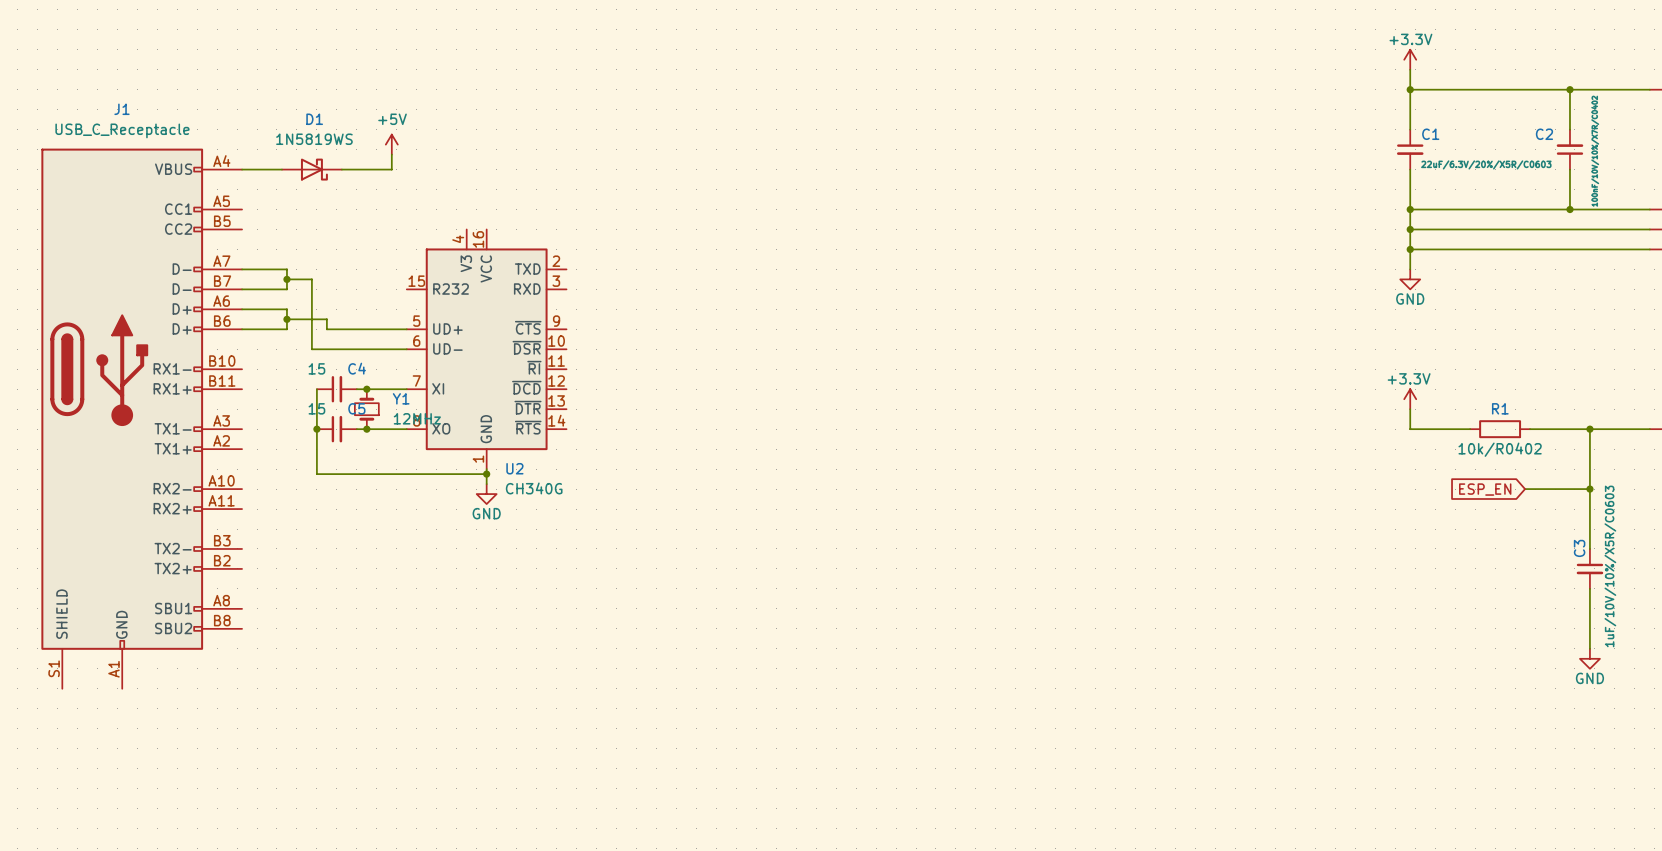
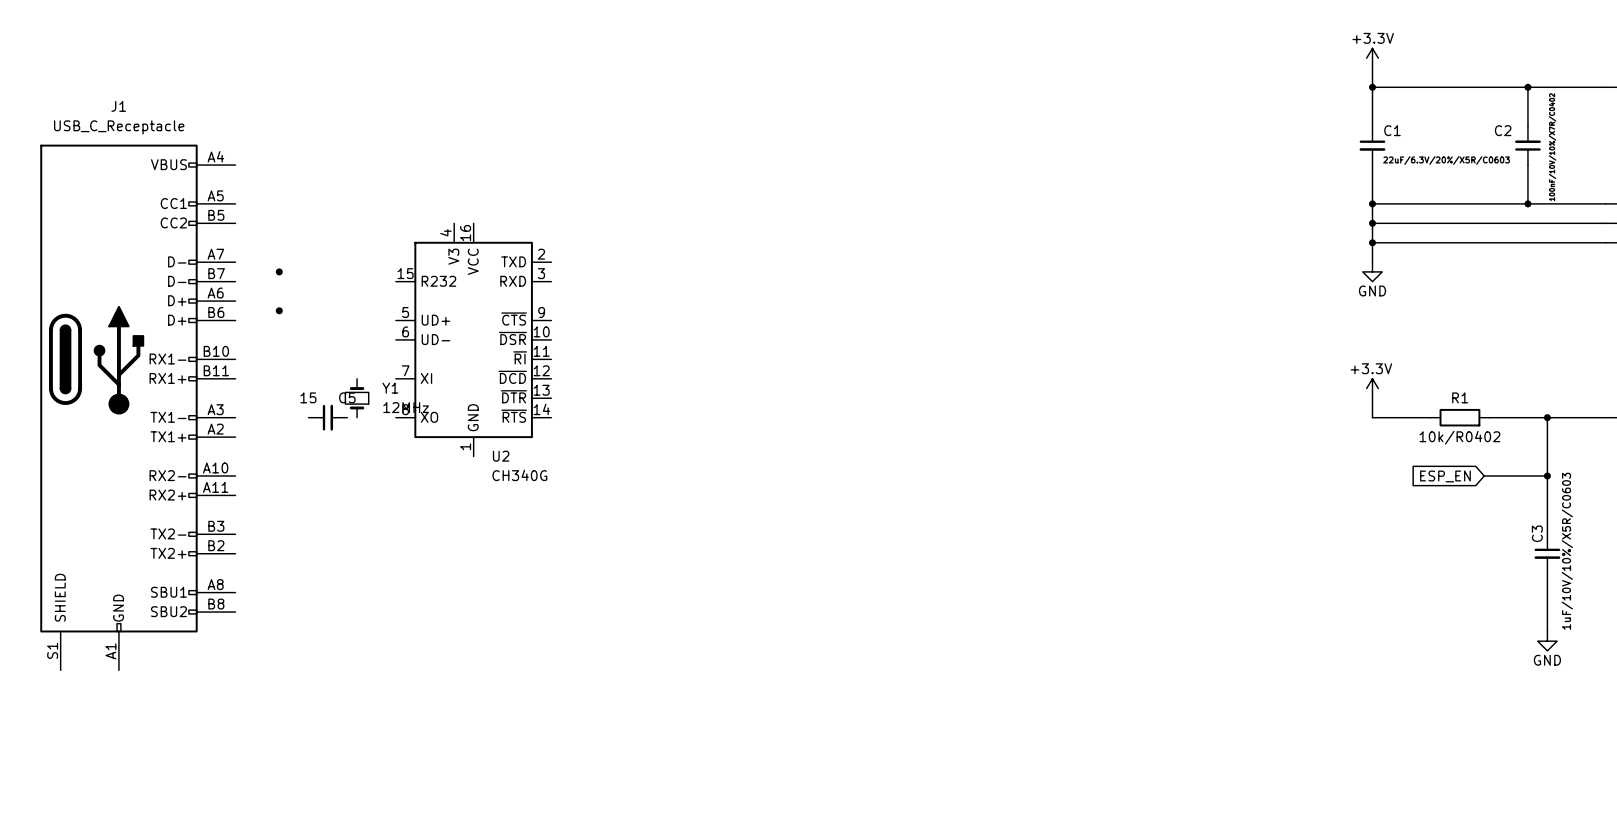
power symbol: +5V (391, 144) -> none
wire: (391, 154) (391, 169) (341, 169) -> none
wire: (242, 169) (281, 169) -> none
D1: 1N5819WS (311, 169) -> none
wire: (242, 269) (286, 269) (286, 289) (242, 289) -> none
wire: (286, 279) (311, 279) (311, 349) (406, 349) -> none
wire: (242, 309) (286, 309) (286, 329) (242, 329) -> none
wire: (286, 319) (326, 319) (326, 329) (406, 329) -> none
wire: (316, 389) (316, 474) (486, 474) -> none
C4: 15 (336, 389) -> none
wire: (356, 389) (406, 389) -> none
junction: (366, 389) -> none
junction: (316, 429) -> none
wire: (356, 429) (406, 429) -> none
junction: (366, 429) -> none
wire: (486, 469) (486, 484) -> none
junction: (486, 474) -> none
power symbol: GND (486, 494) -> none

